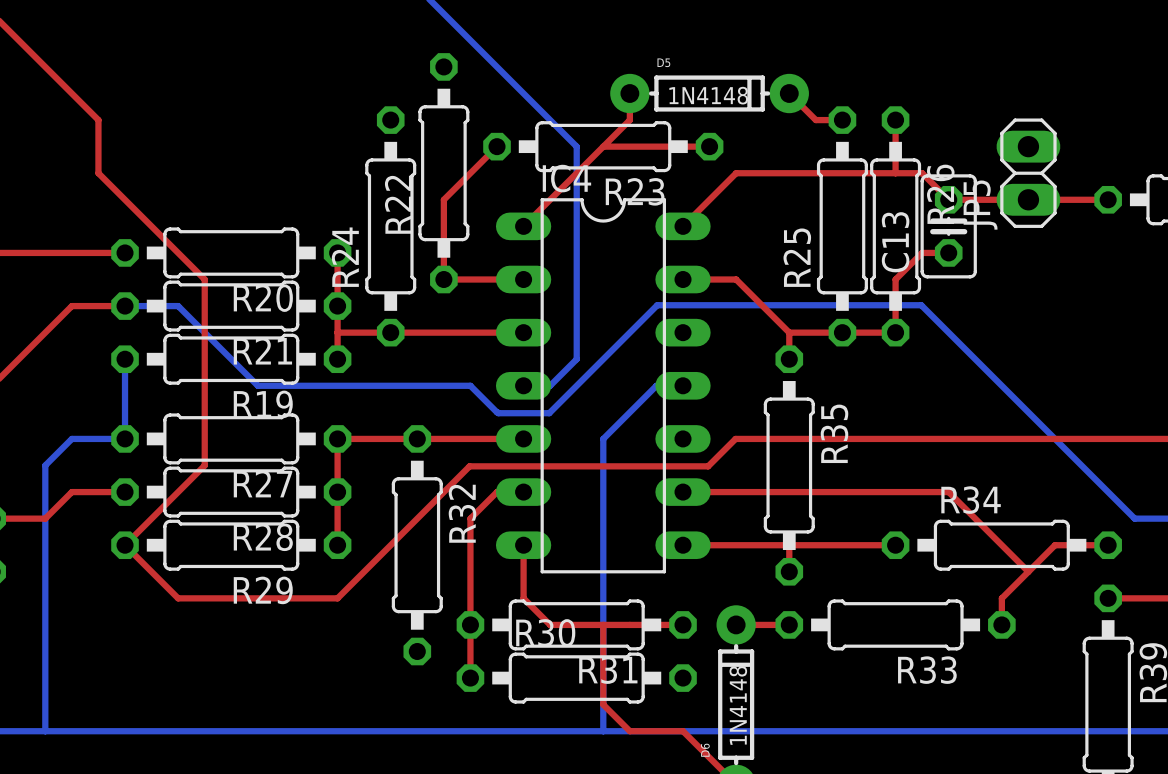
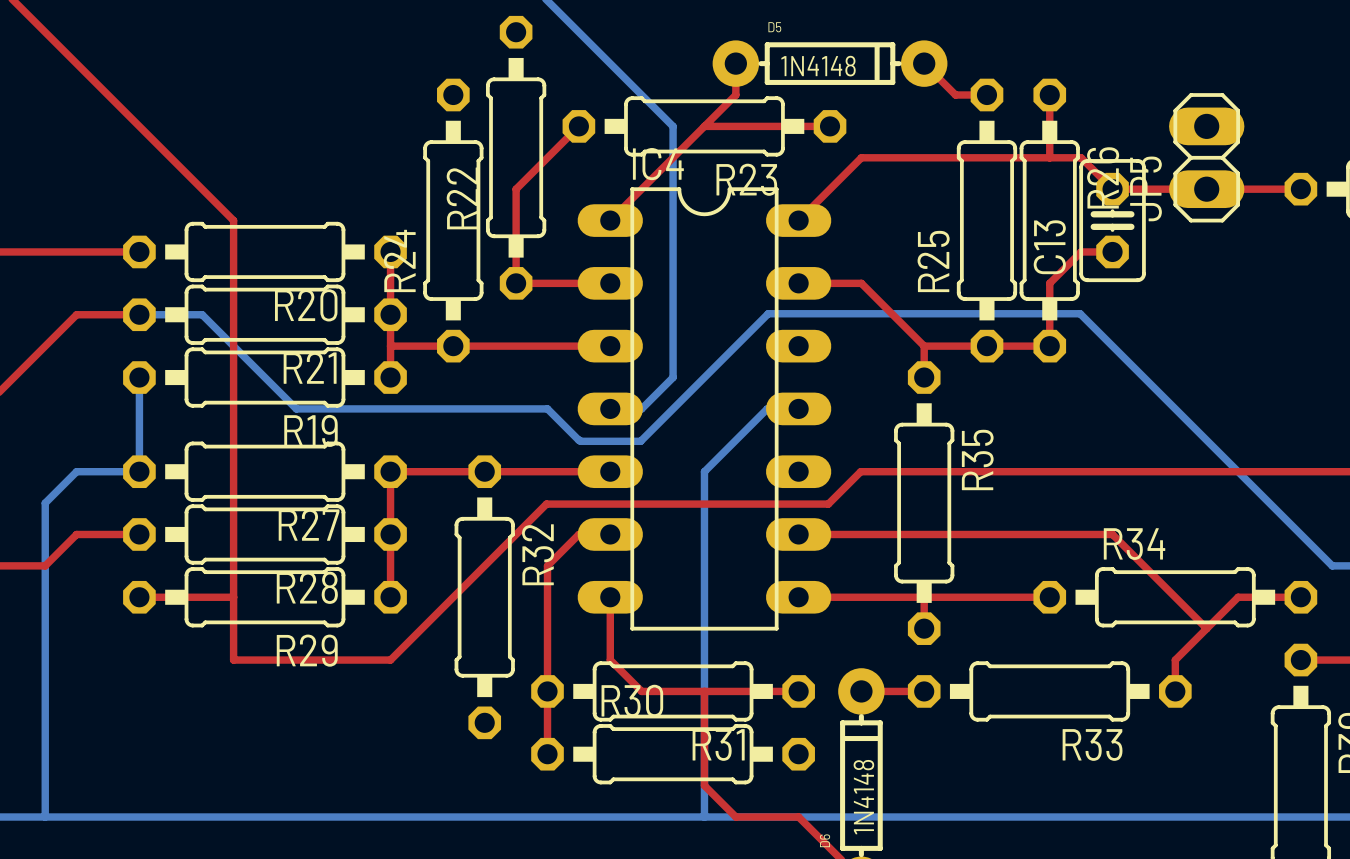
top track: (98, 120) (98, 173) (204, 279) -> (108, 95) (233, 220) (233, 283)
top track: (204, 465) (125, 545) (178, 598) (204, 598) -> (233, 503) (233, 660)
top track: none -> (139, 597) (233, 597)

